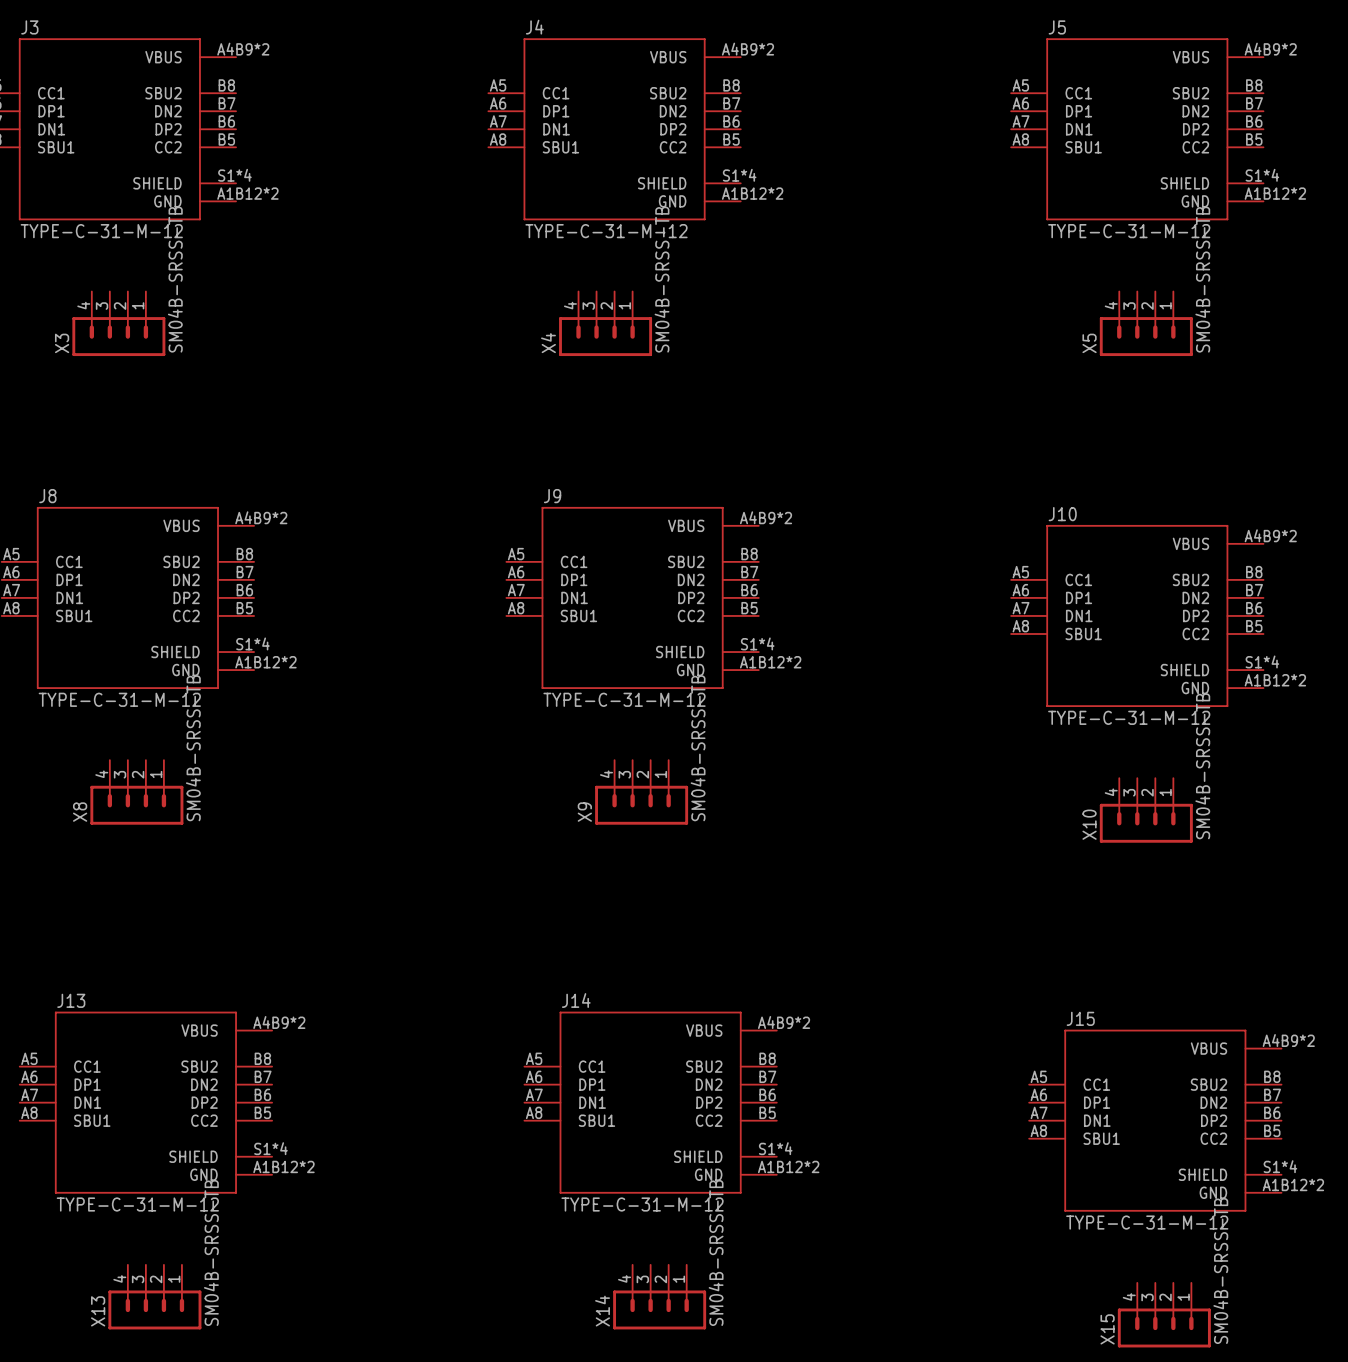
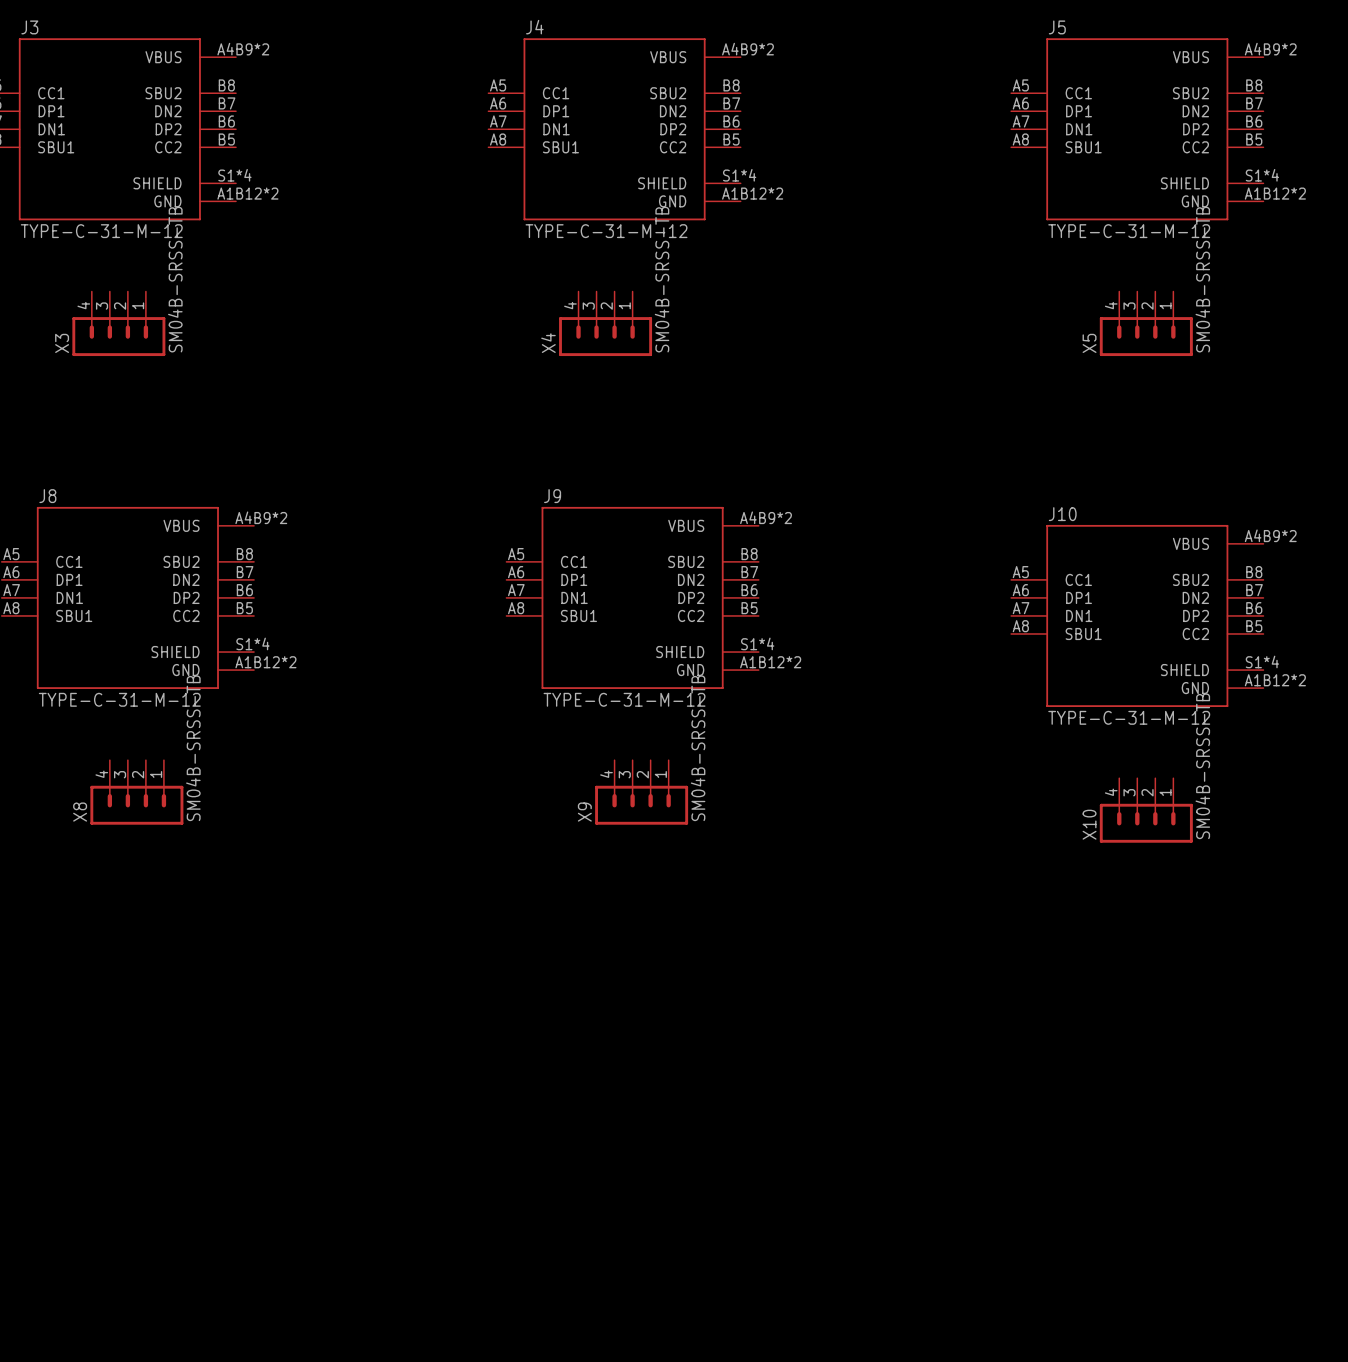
J13: TYPE-C-31-M-12 (145, 1102) -> none
J14: TYPE-C-31-M-12 (650, 1102) -> none
J15: TYPE-C-31-M-12 (1155, 1120) -> none
X13: SM04B-SRSS-TB (154, 1297) -> none
X14: SM04B-SRSS-TB (659, 1297) -> none
X15: SM04B-SRSS-TB (1164, 1315) -> none

